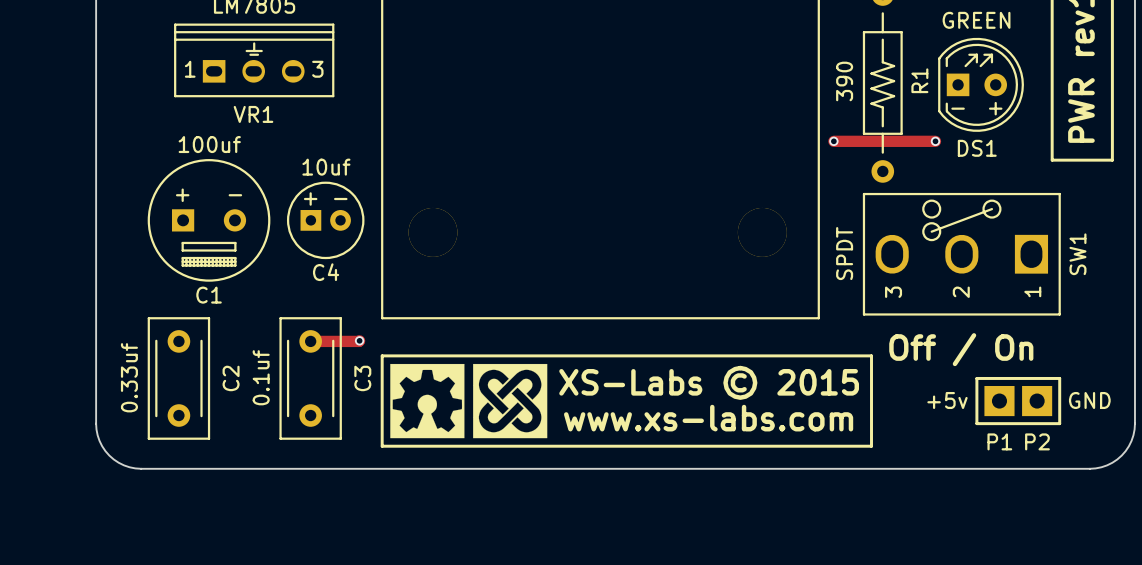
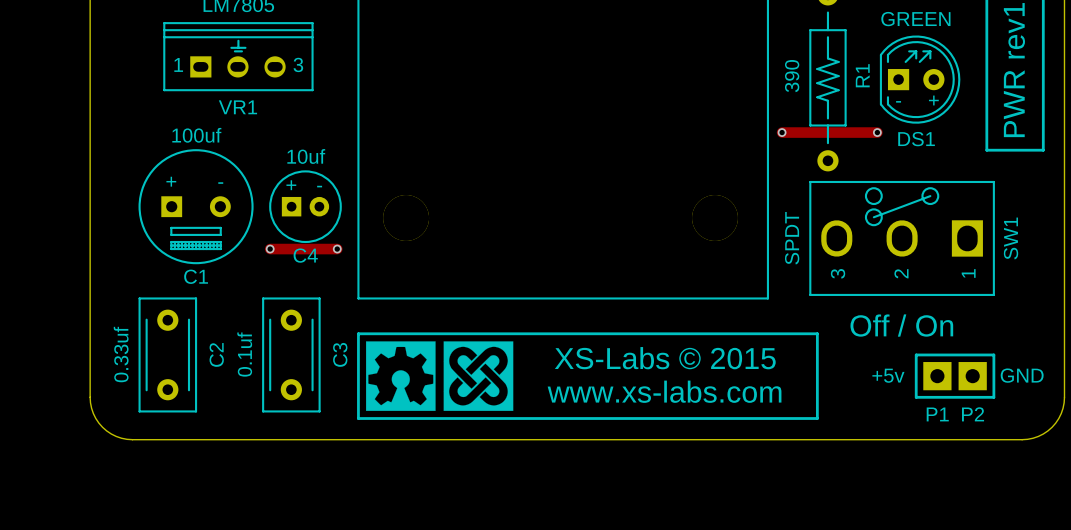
track: none -> (270, 249) (337, 249)
via: none -> (270, 249)
via: none -> (337, 249)
track: (359, 340) (310, 341) -> none
via: (359, 340) -> none

